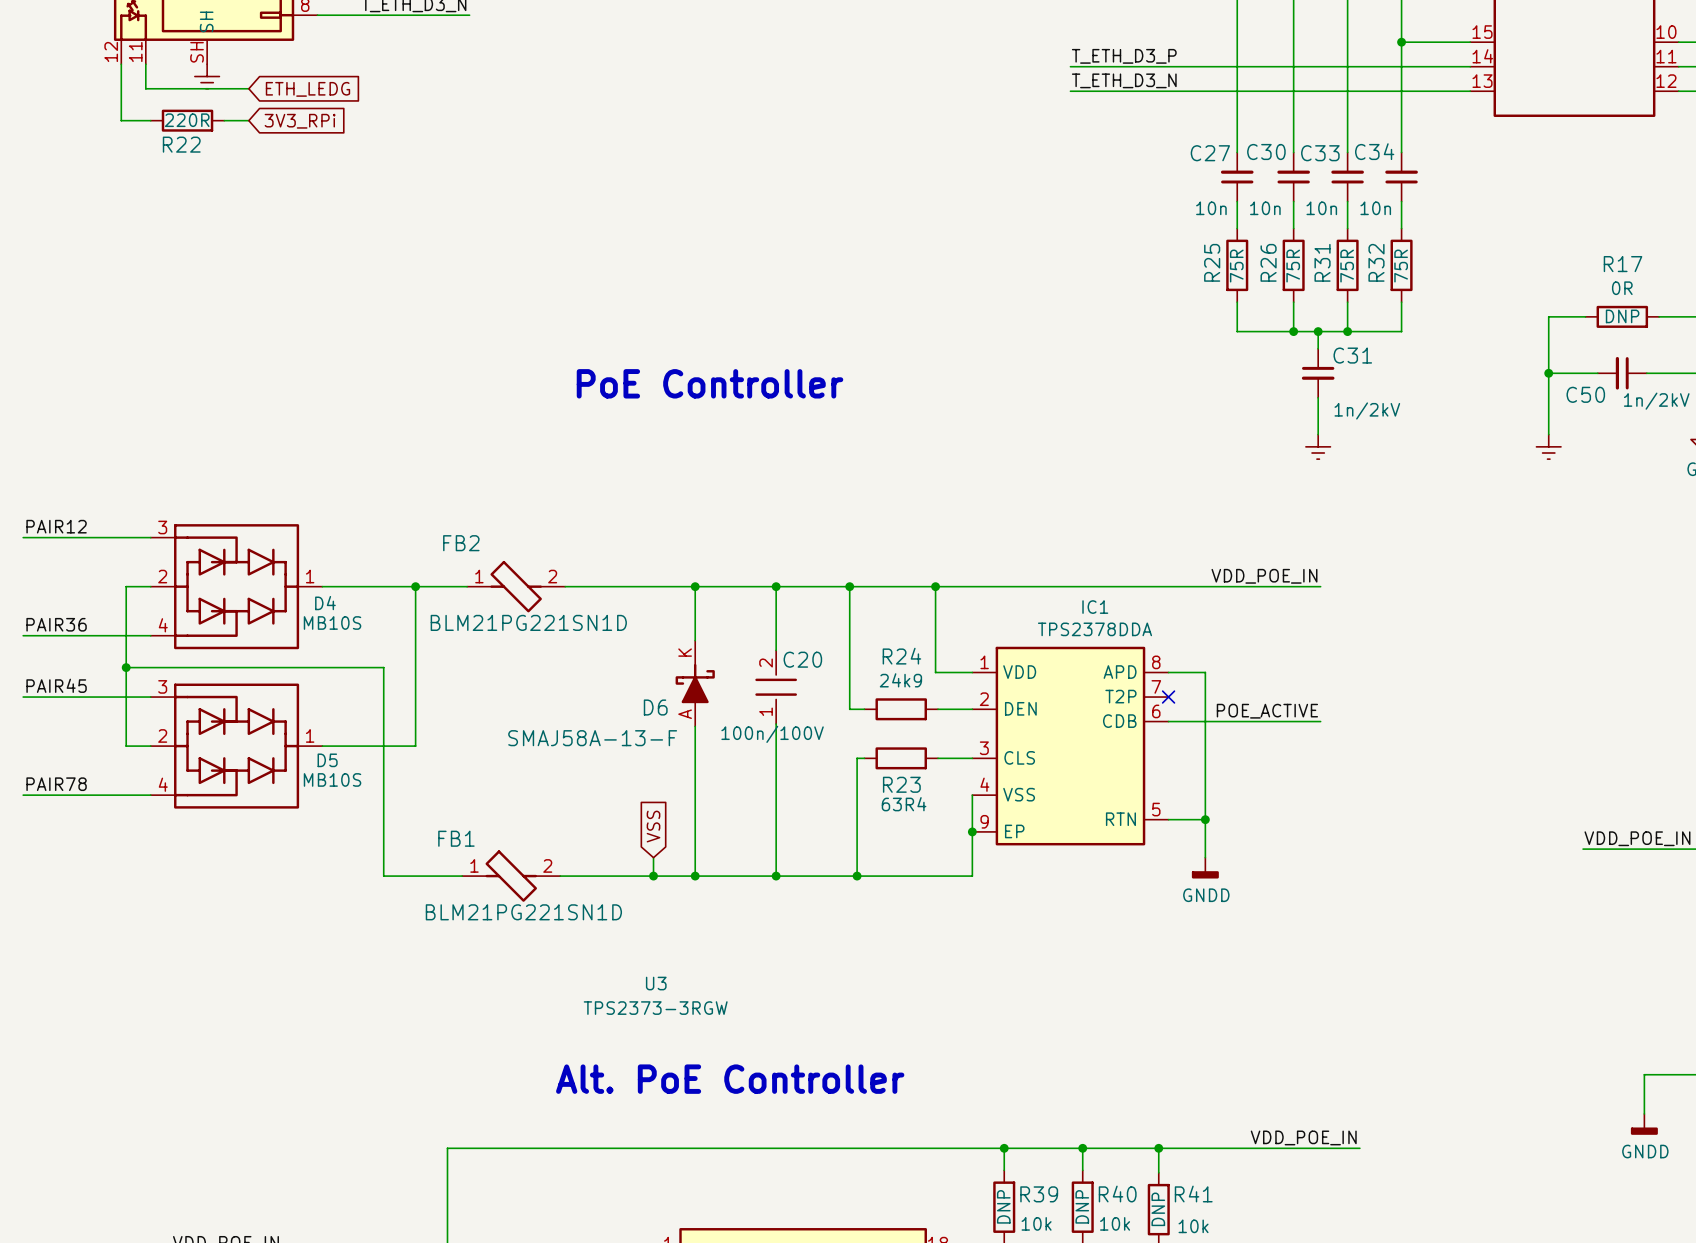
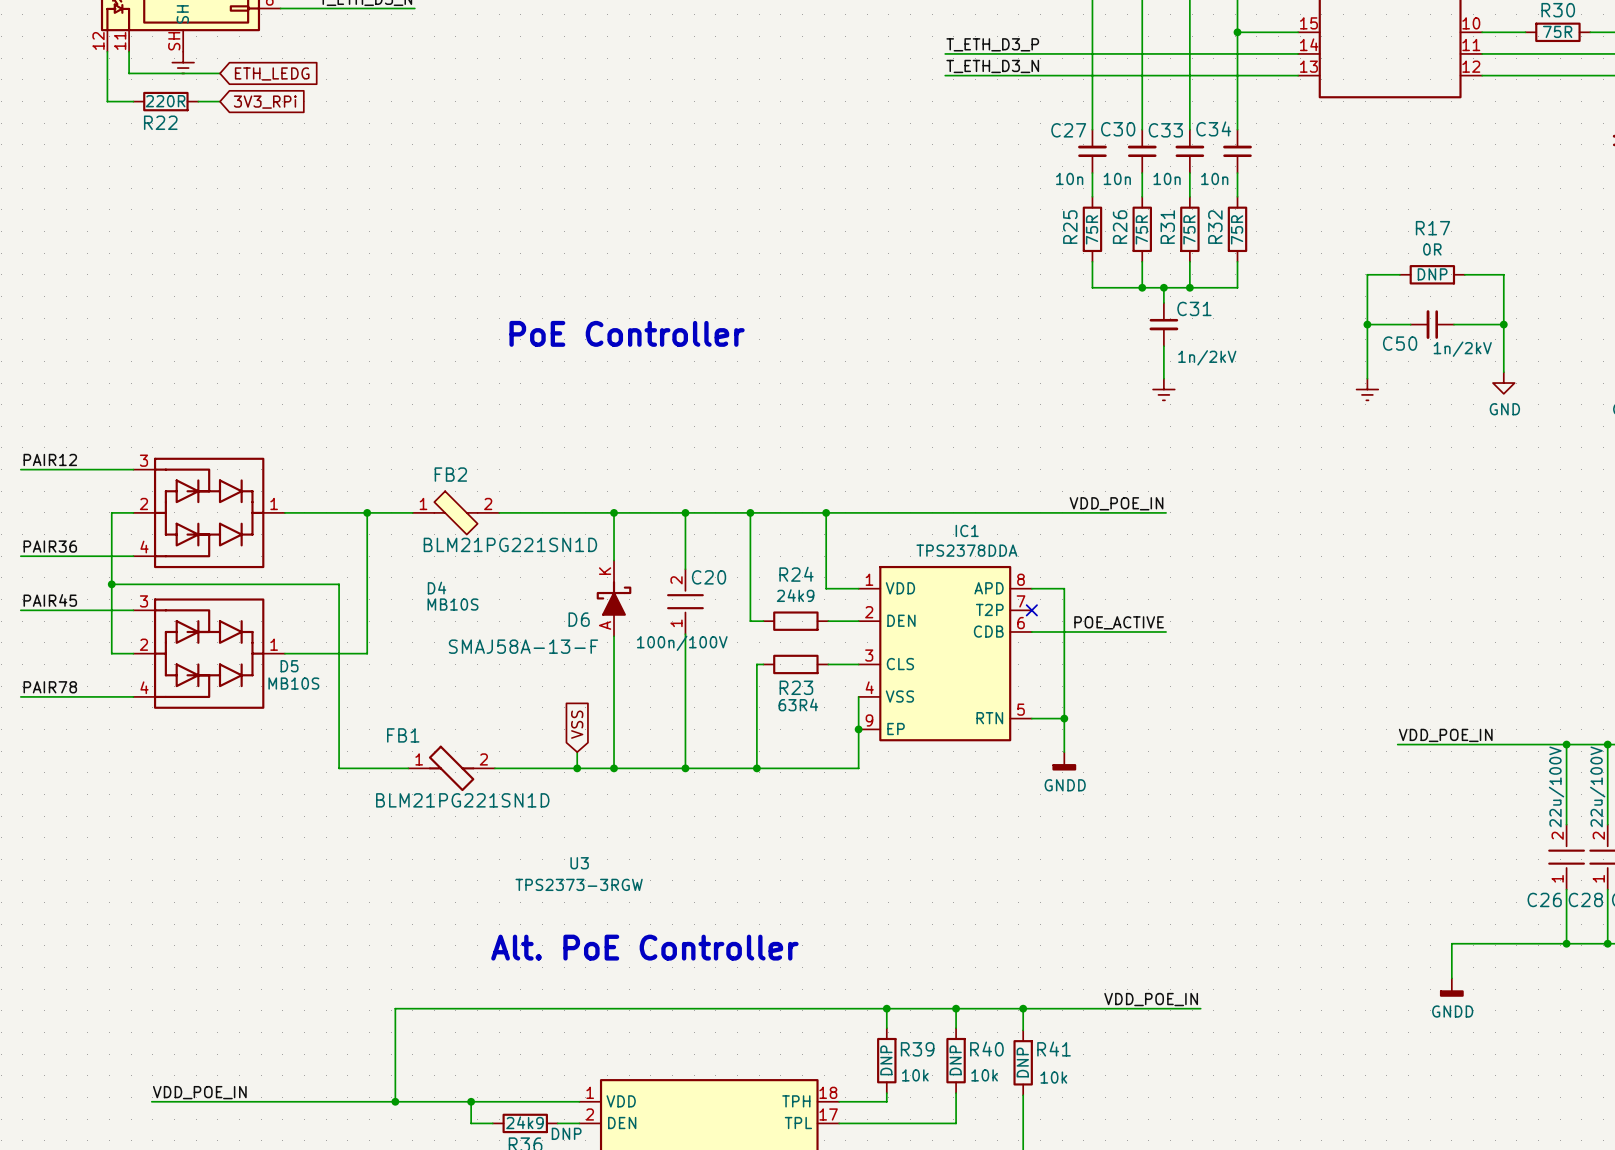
FB2 name position: FB2 (461, 543) -> FB2 (450, 474)
FB2 symbol: [467, 560, 566, 613] -> [412, 491, 500, 535]
D4 name position: D4 (325, 603) -> D4 (437, 588)
D4 value position: MB10S (332, 622) -> MB10S (452, 604)
FB2 value position: BLM21PG221SN1D (528, 622) -> BLM21PG221SN1D (510, 544)

